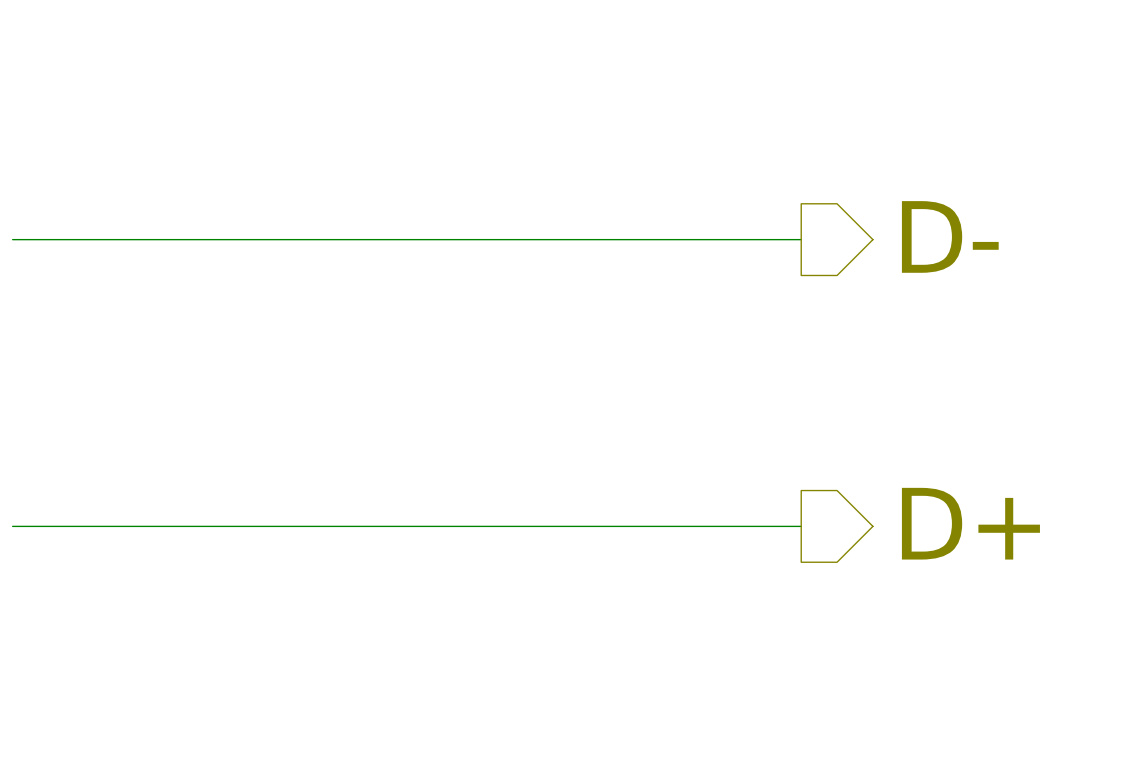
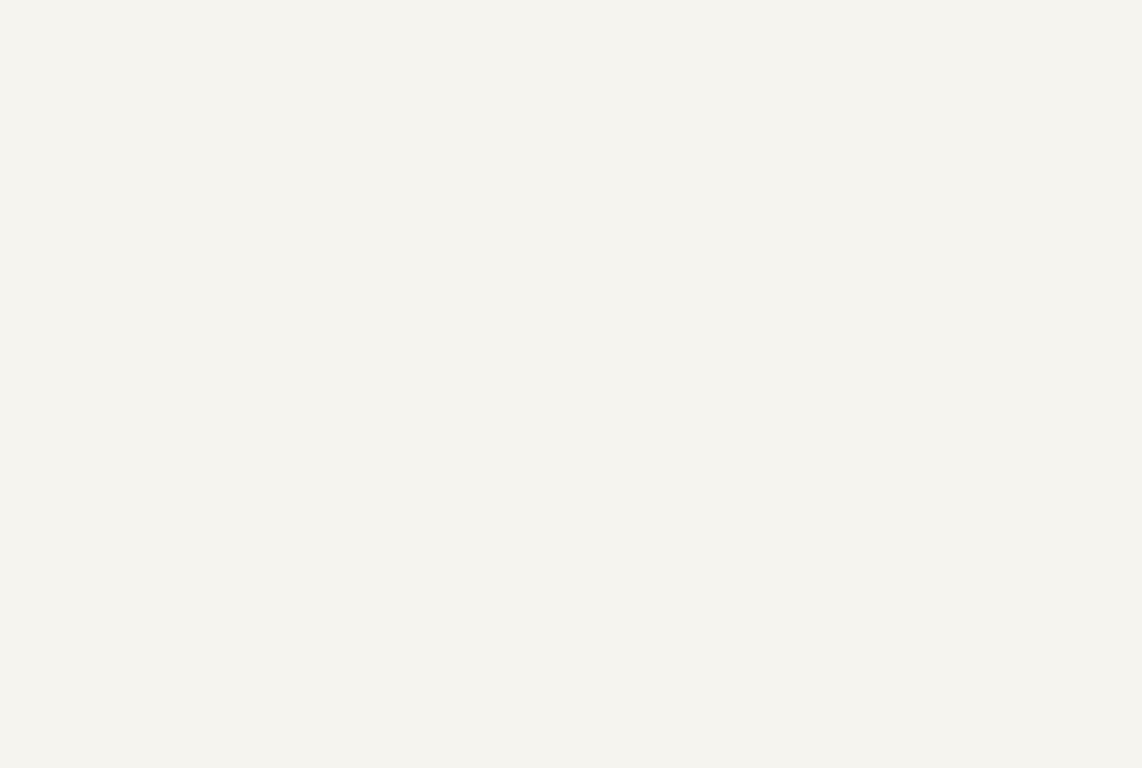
hierarchical label: D- (950, 236) -> none
wire: (12, 239) (801, 239) -> none
hierarchical label: D+ (970, 523) -> none
wire: (12, 526) (801, 526) -> none

